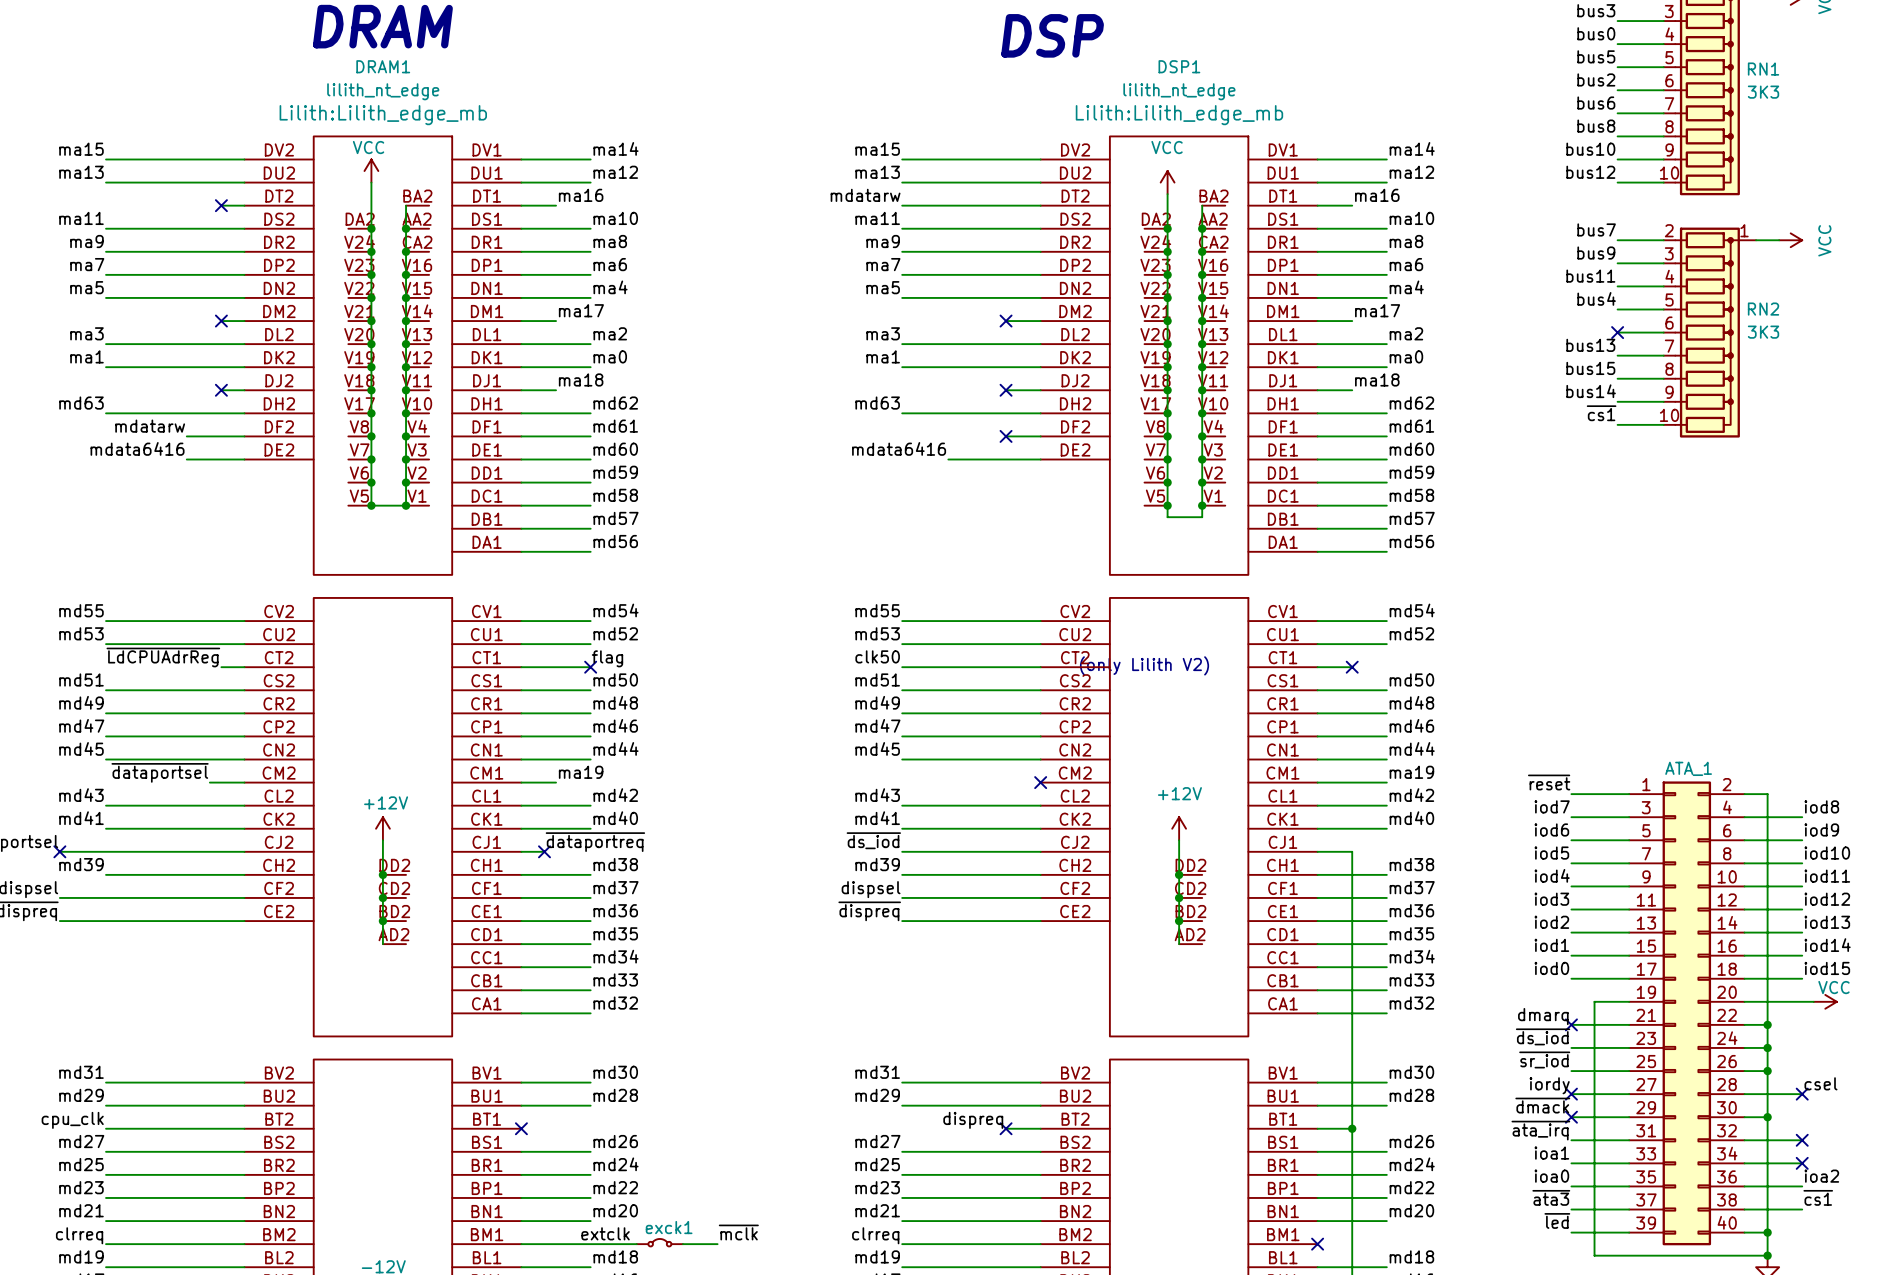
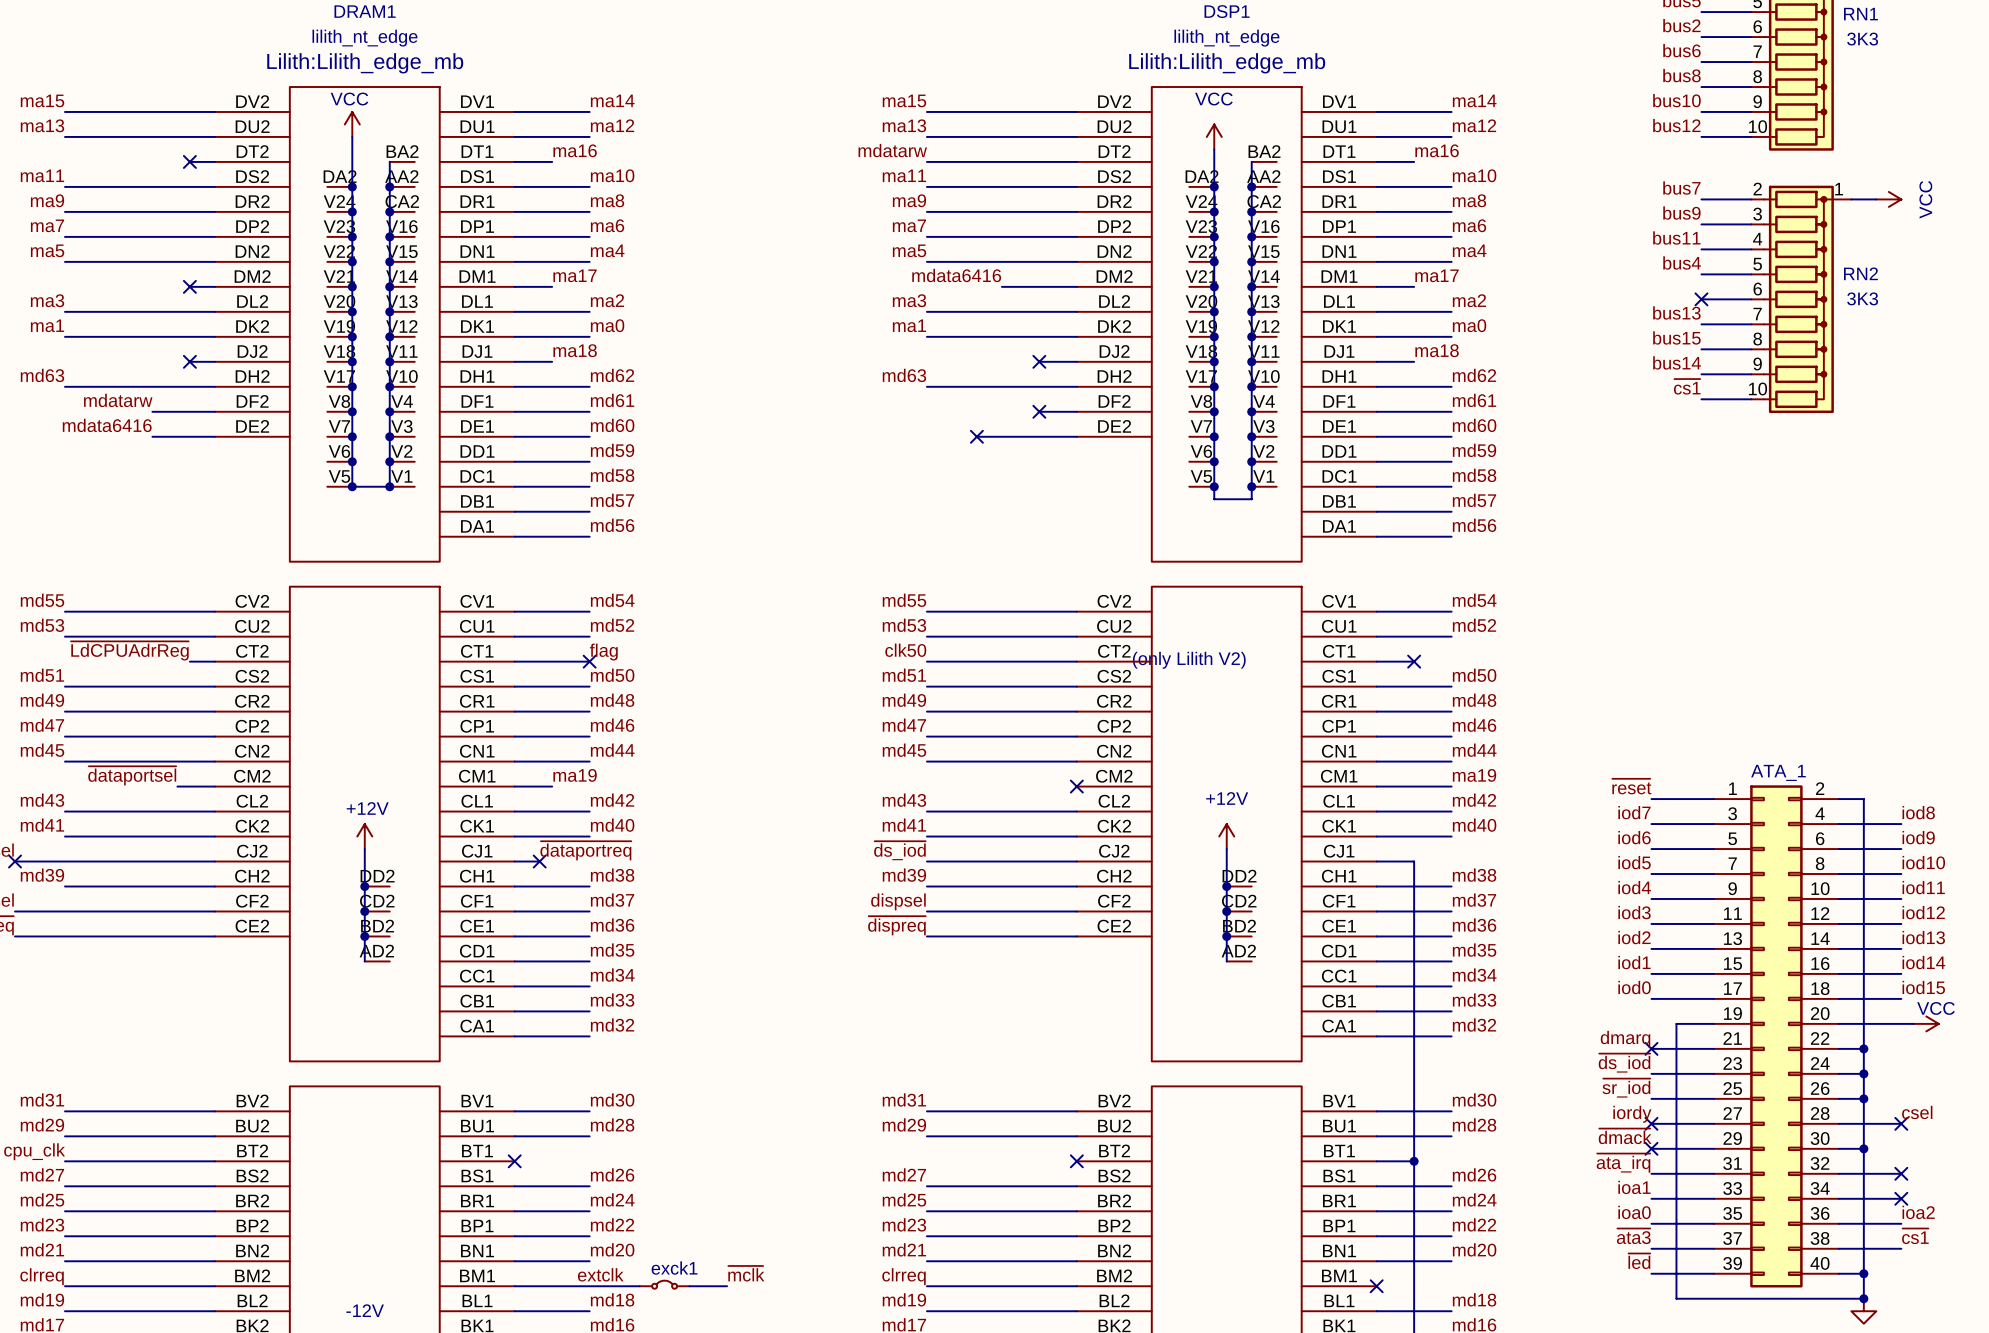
wire: none -> (1001, 286) (1039, 286)
no-connect mark: (1006, 321) -> none
label position: mdata6416 (899, 448) -> mdata6416 (956, 275)
no-connect mark: none -> (976, 436)
label: dispreq (973, 1120) -> none
wire: (1006, 1128) (1040, 1128) -> none
no-connect mark position: (1006, 1128) -> (1076, 1161)

